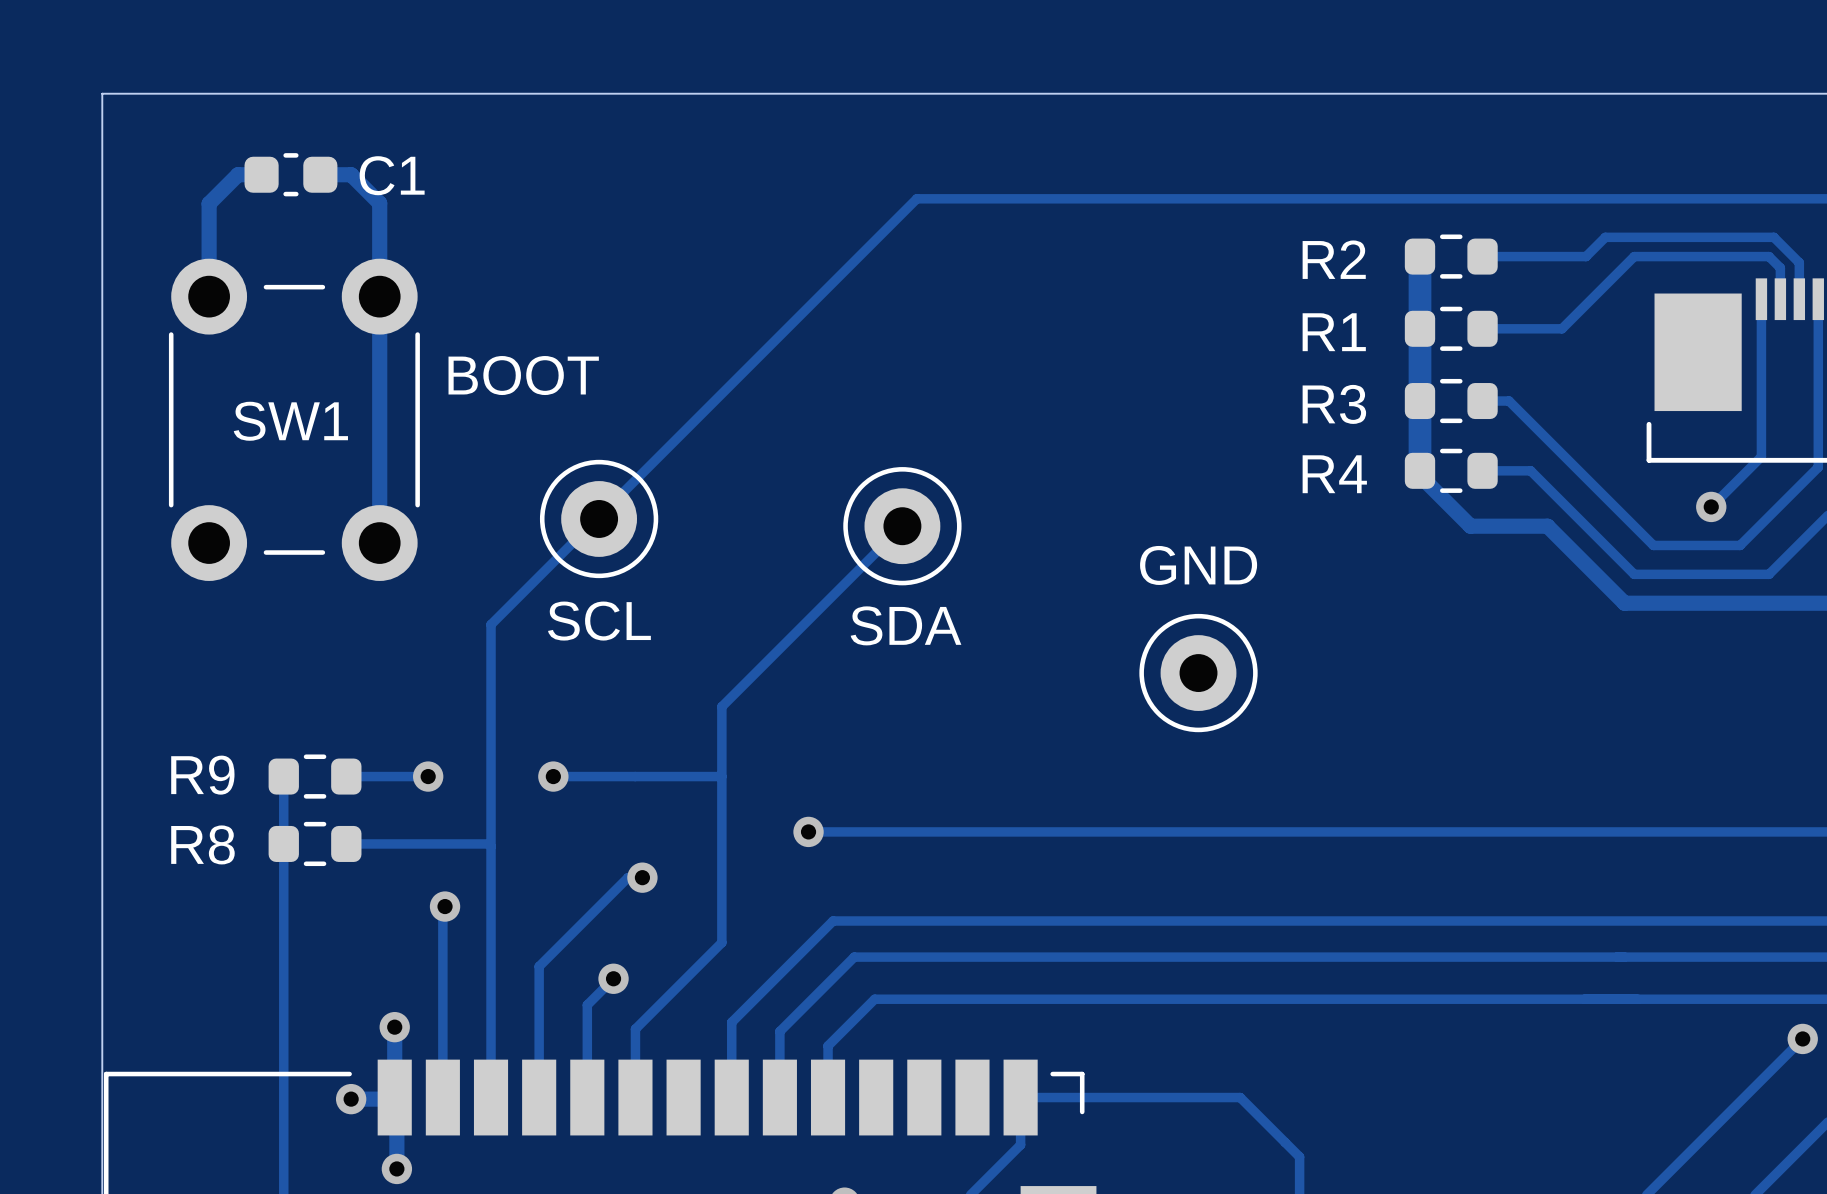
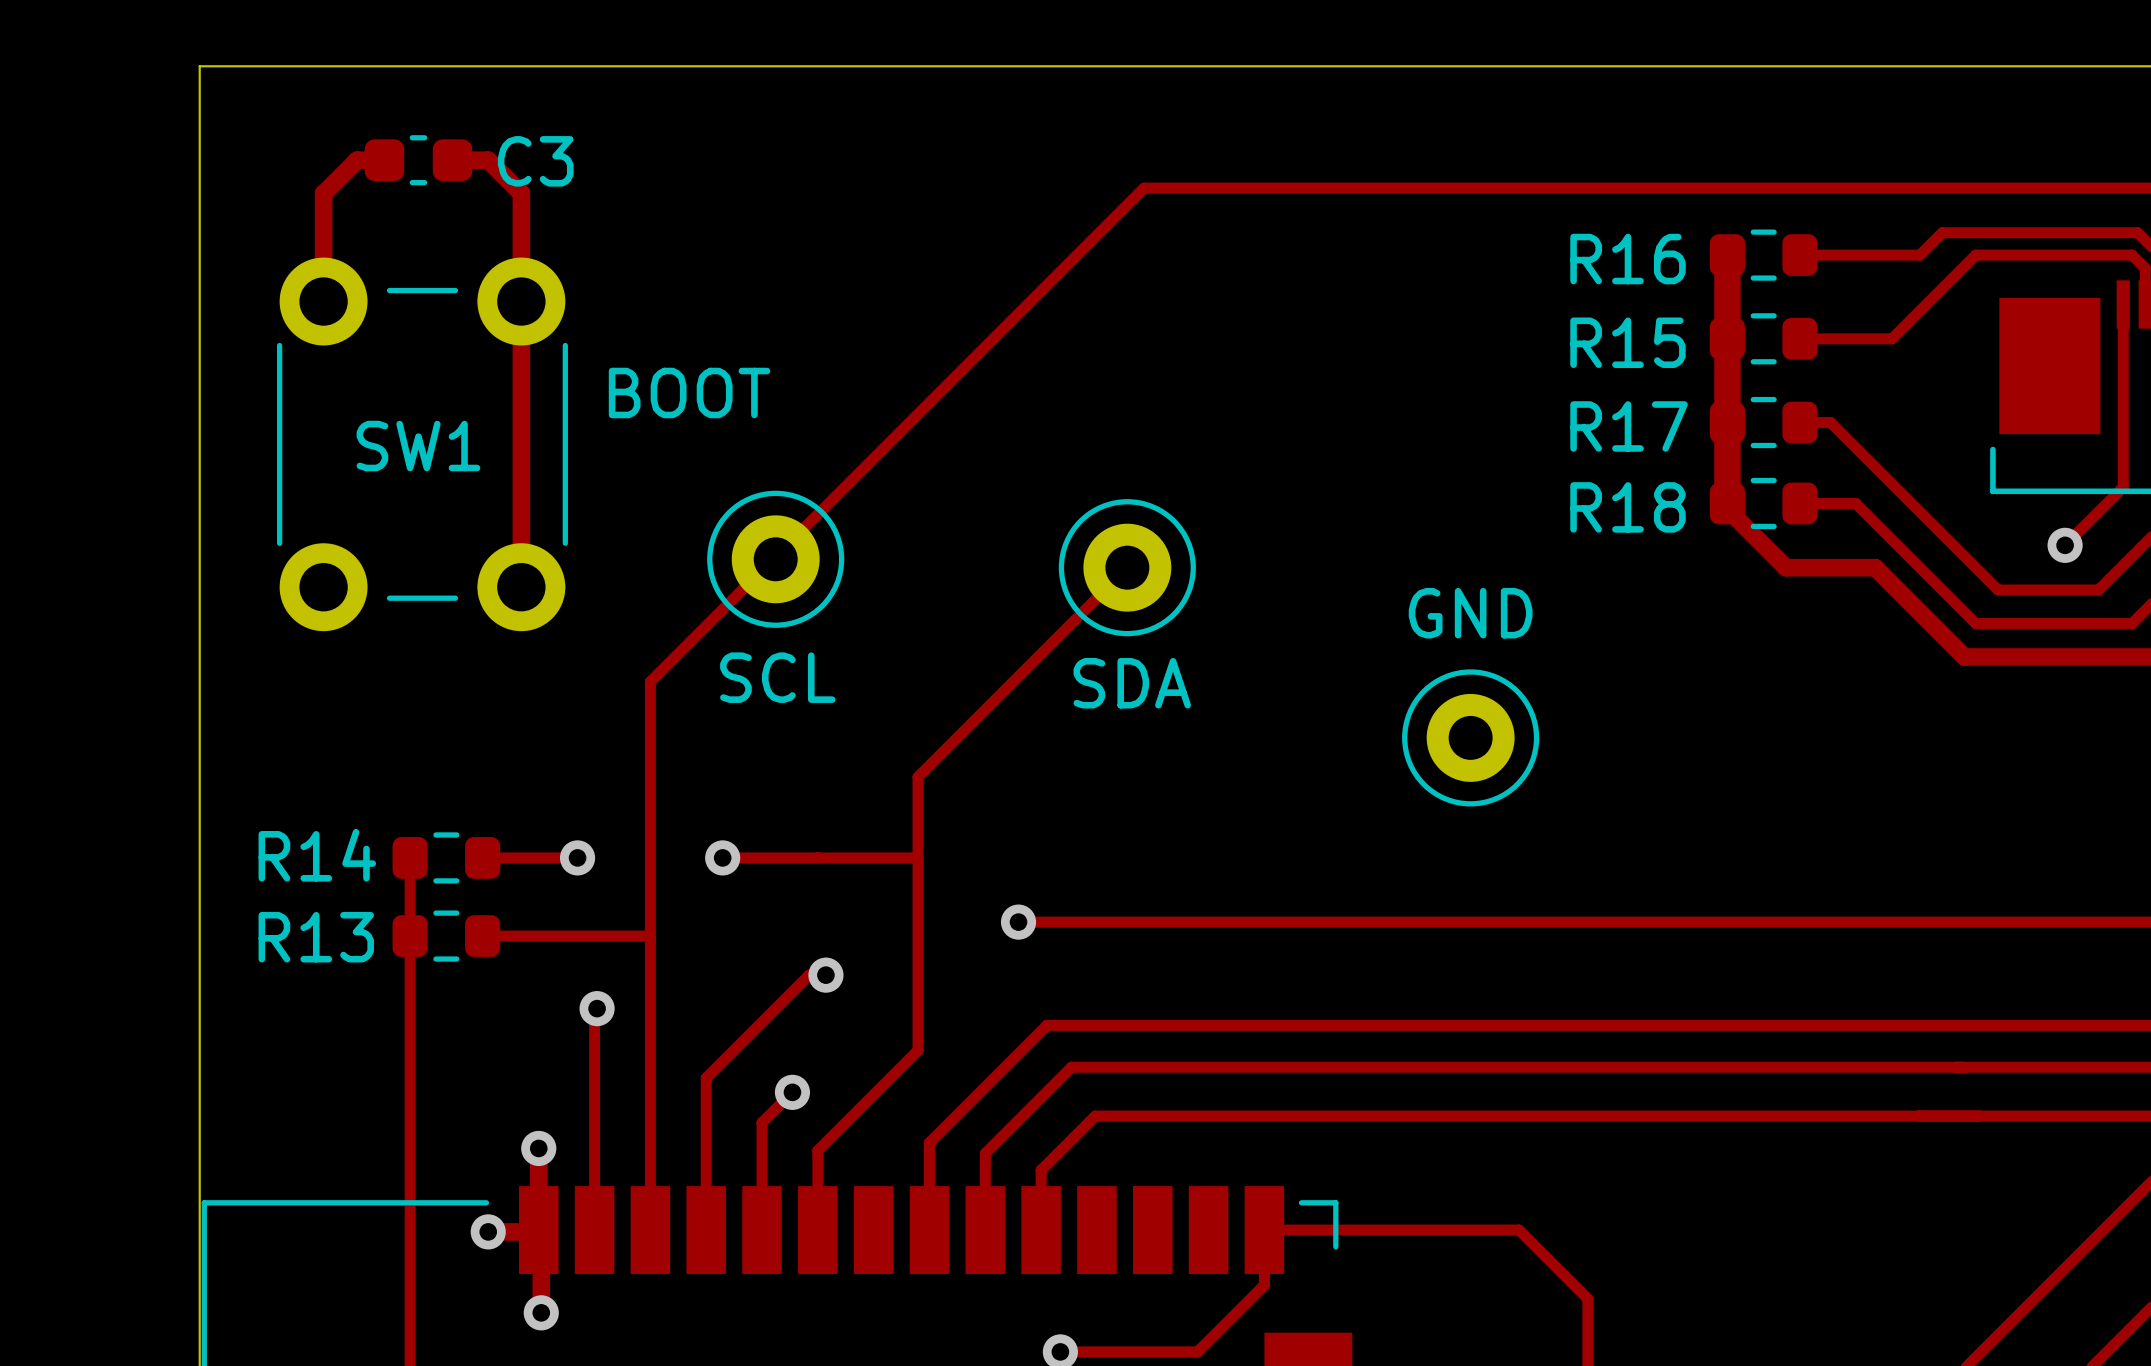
C1 name: C1 (392, 175) -> C3 (535, 161)
R2 name: R2 (1334, 259) -> R16 (1627, 259)
R1 name: R1 (1334, 332) -> R15 (1627, 342)
R3 name: R3 (1334, 404) -> R17 (1629, 426)
R4 name: R4 (1334, 474) -> R18 (1627, 507)
R9 name: R9 (202, 775) -> R14 (317, 855)
R8 name: R8 (202, 844) -> R13 (316, 937)

